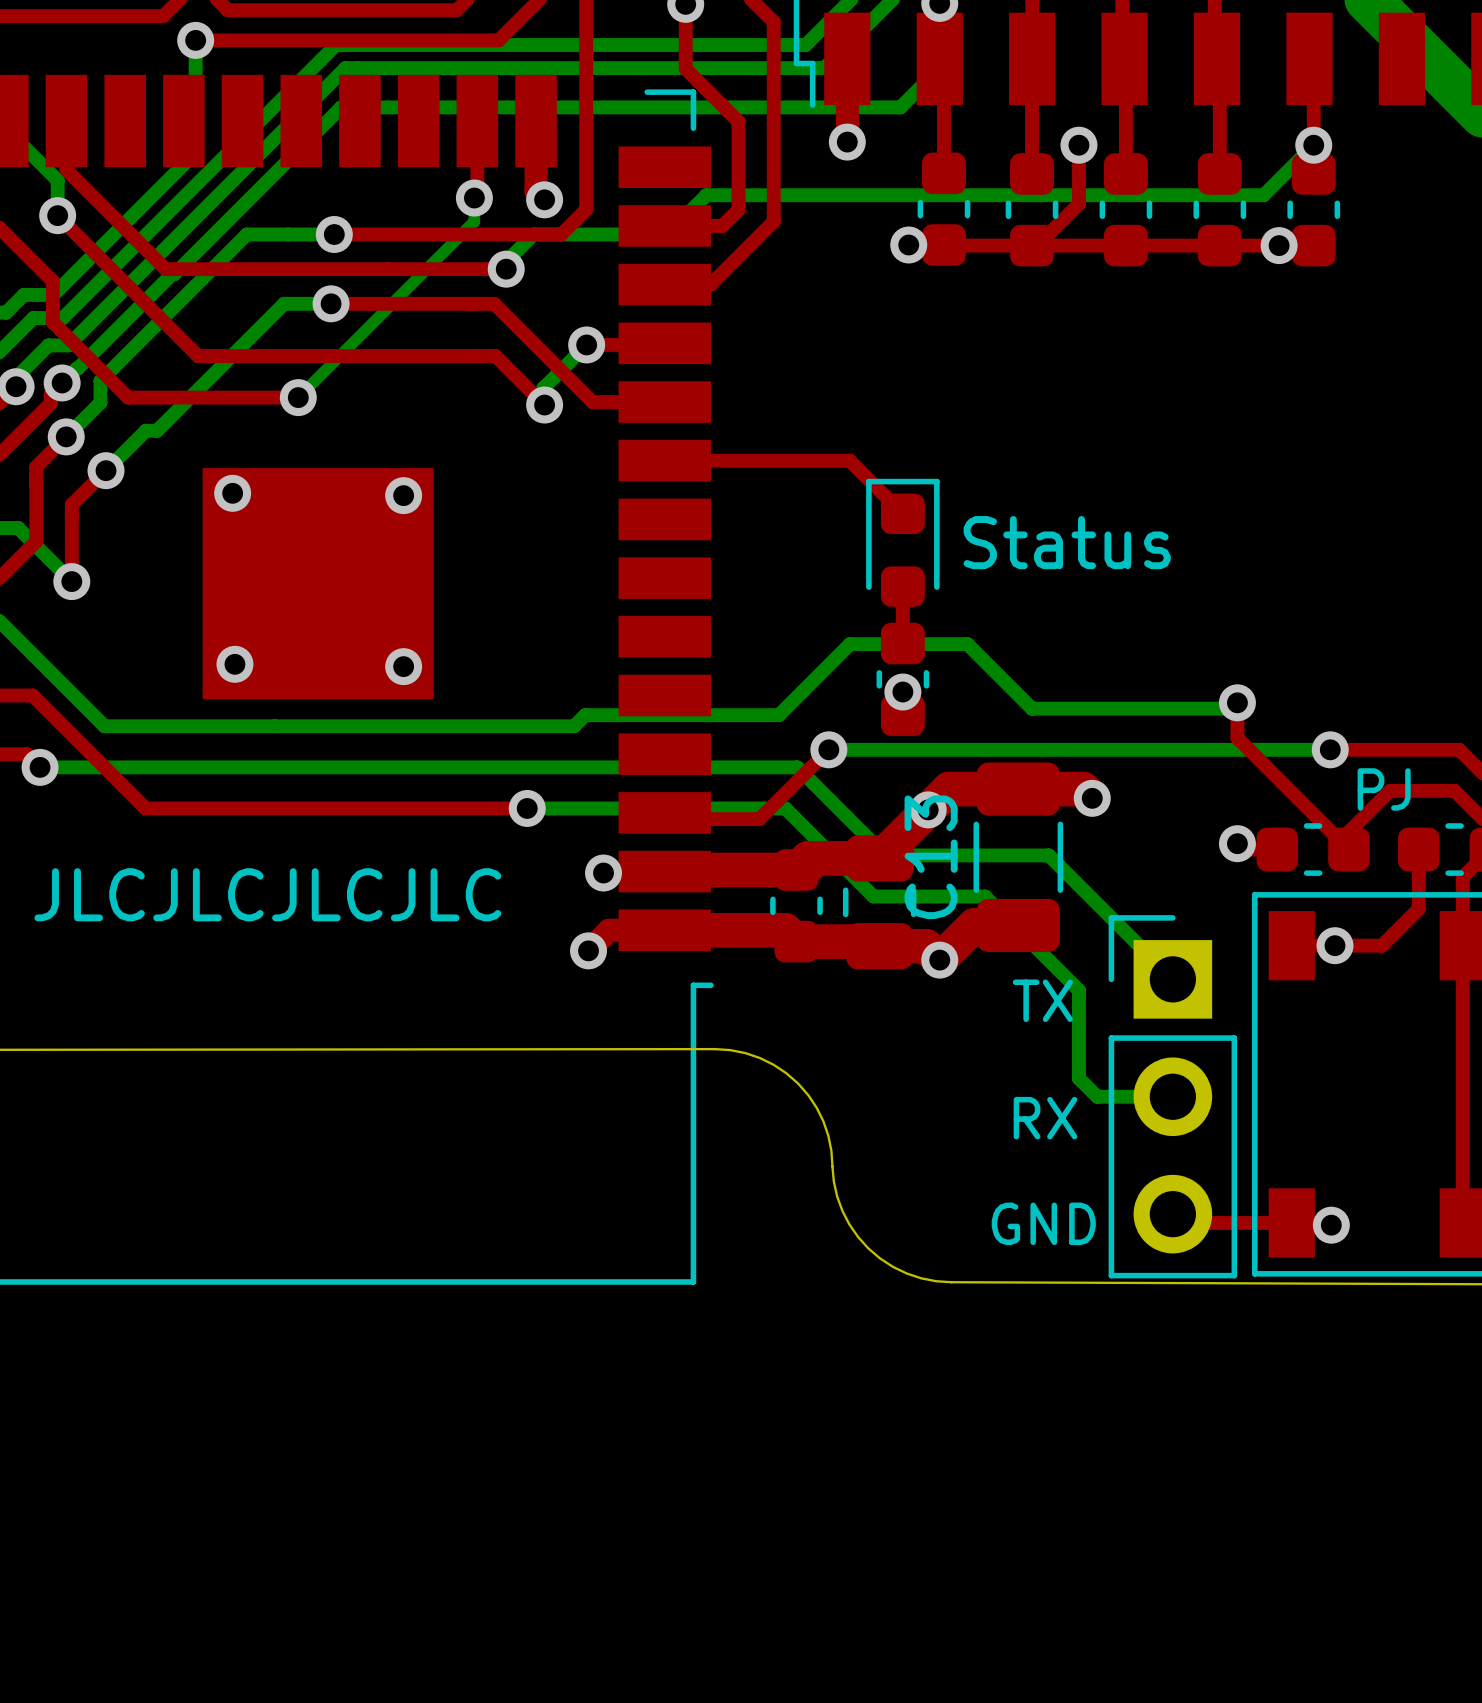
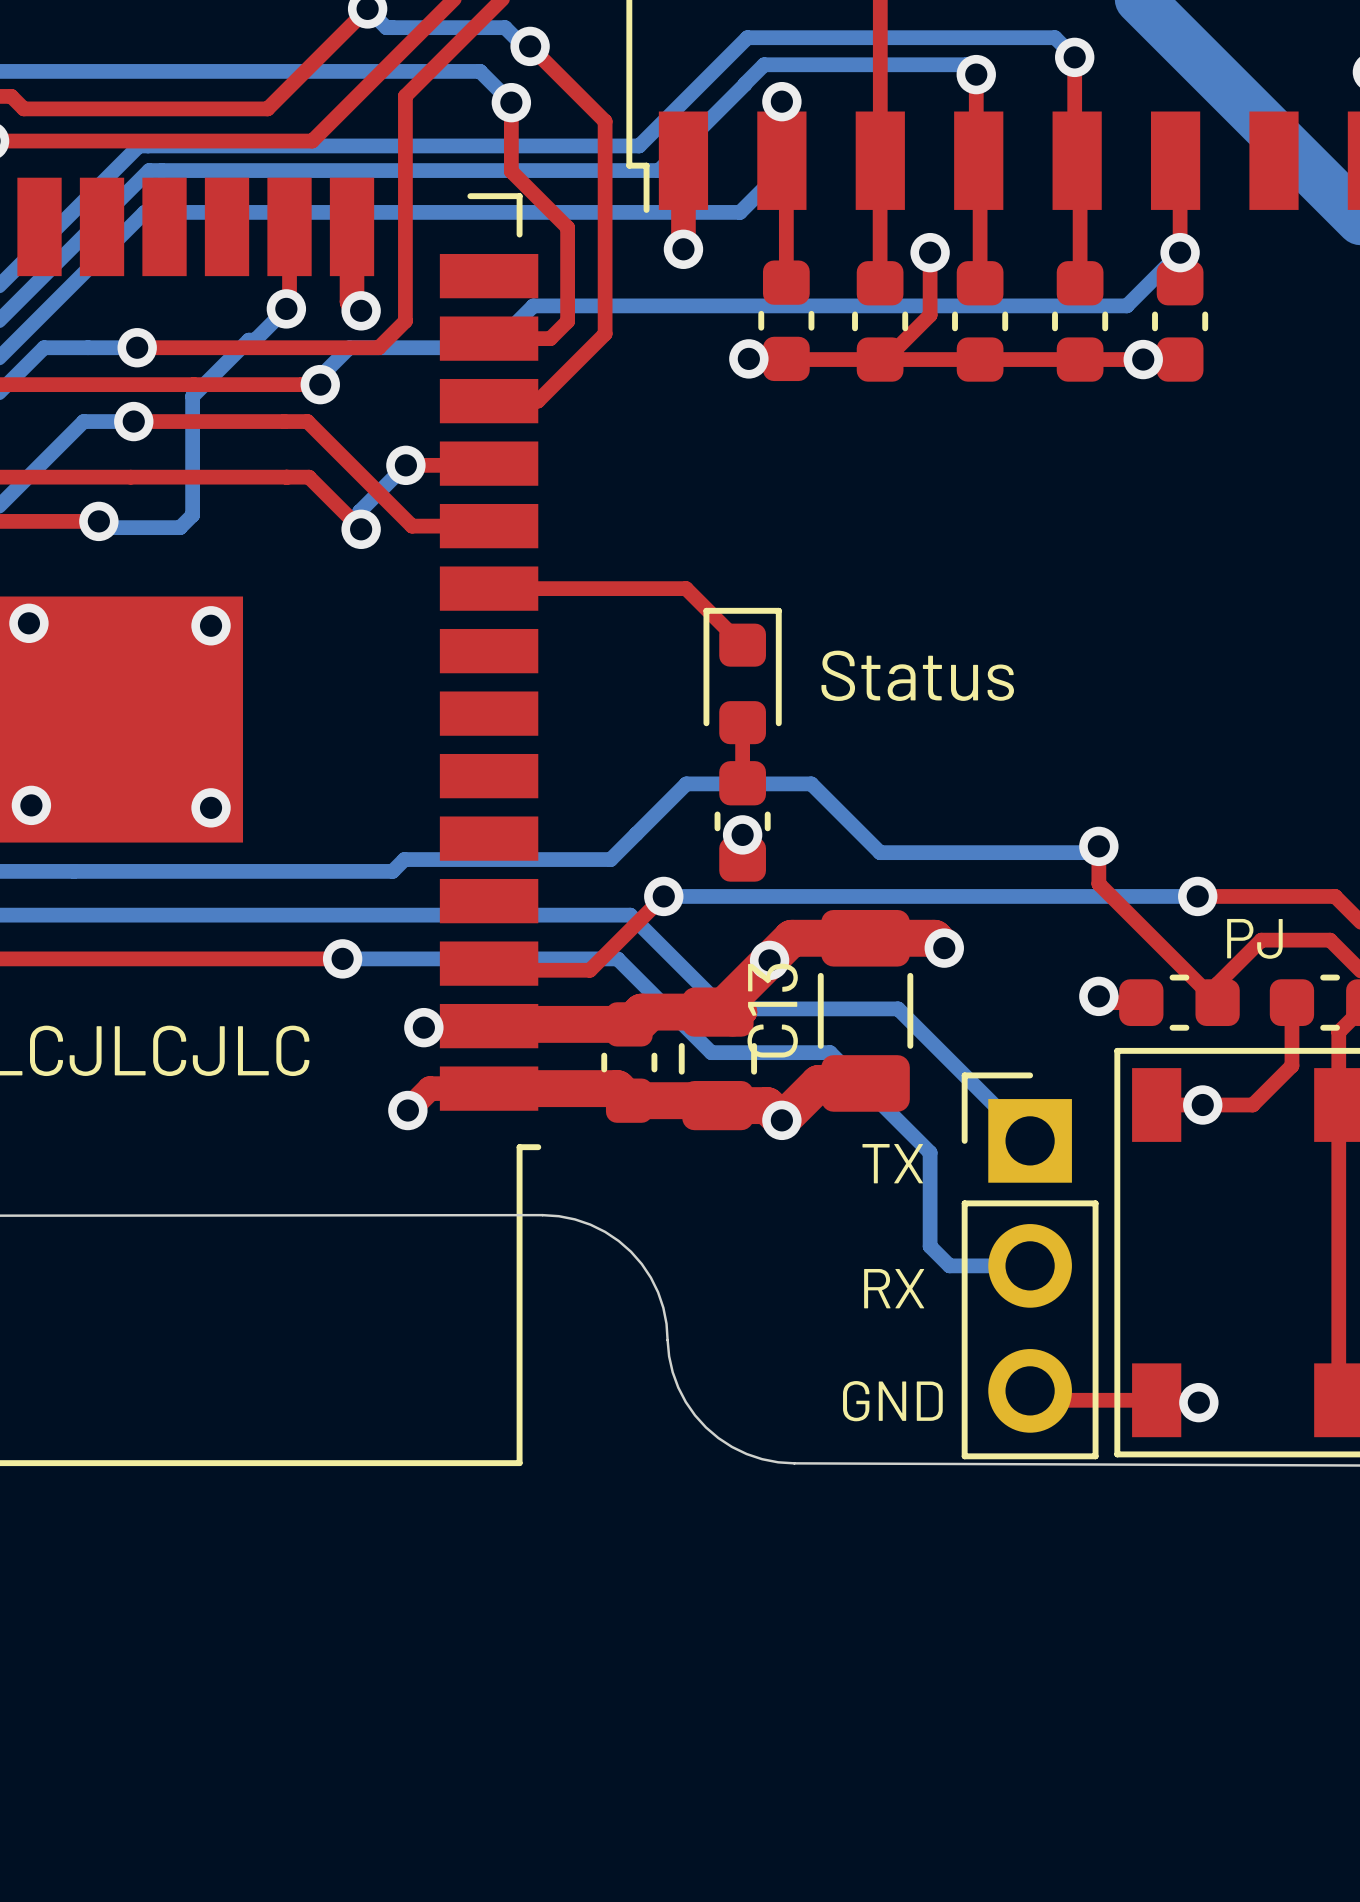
bottom track: (474, 198) (474, 221) (298, 397) -> (286, 308) (255, 340) (248, 340) (192, 396) (192, 515) (180, 527) (105, 527)

